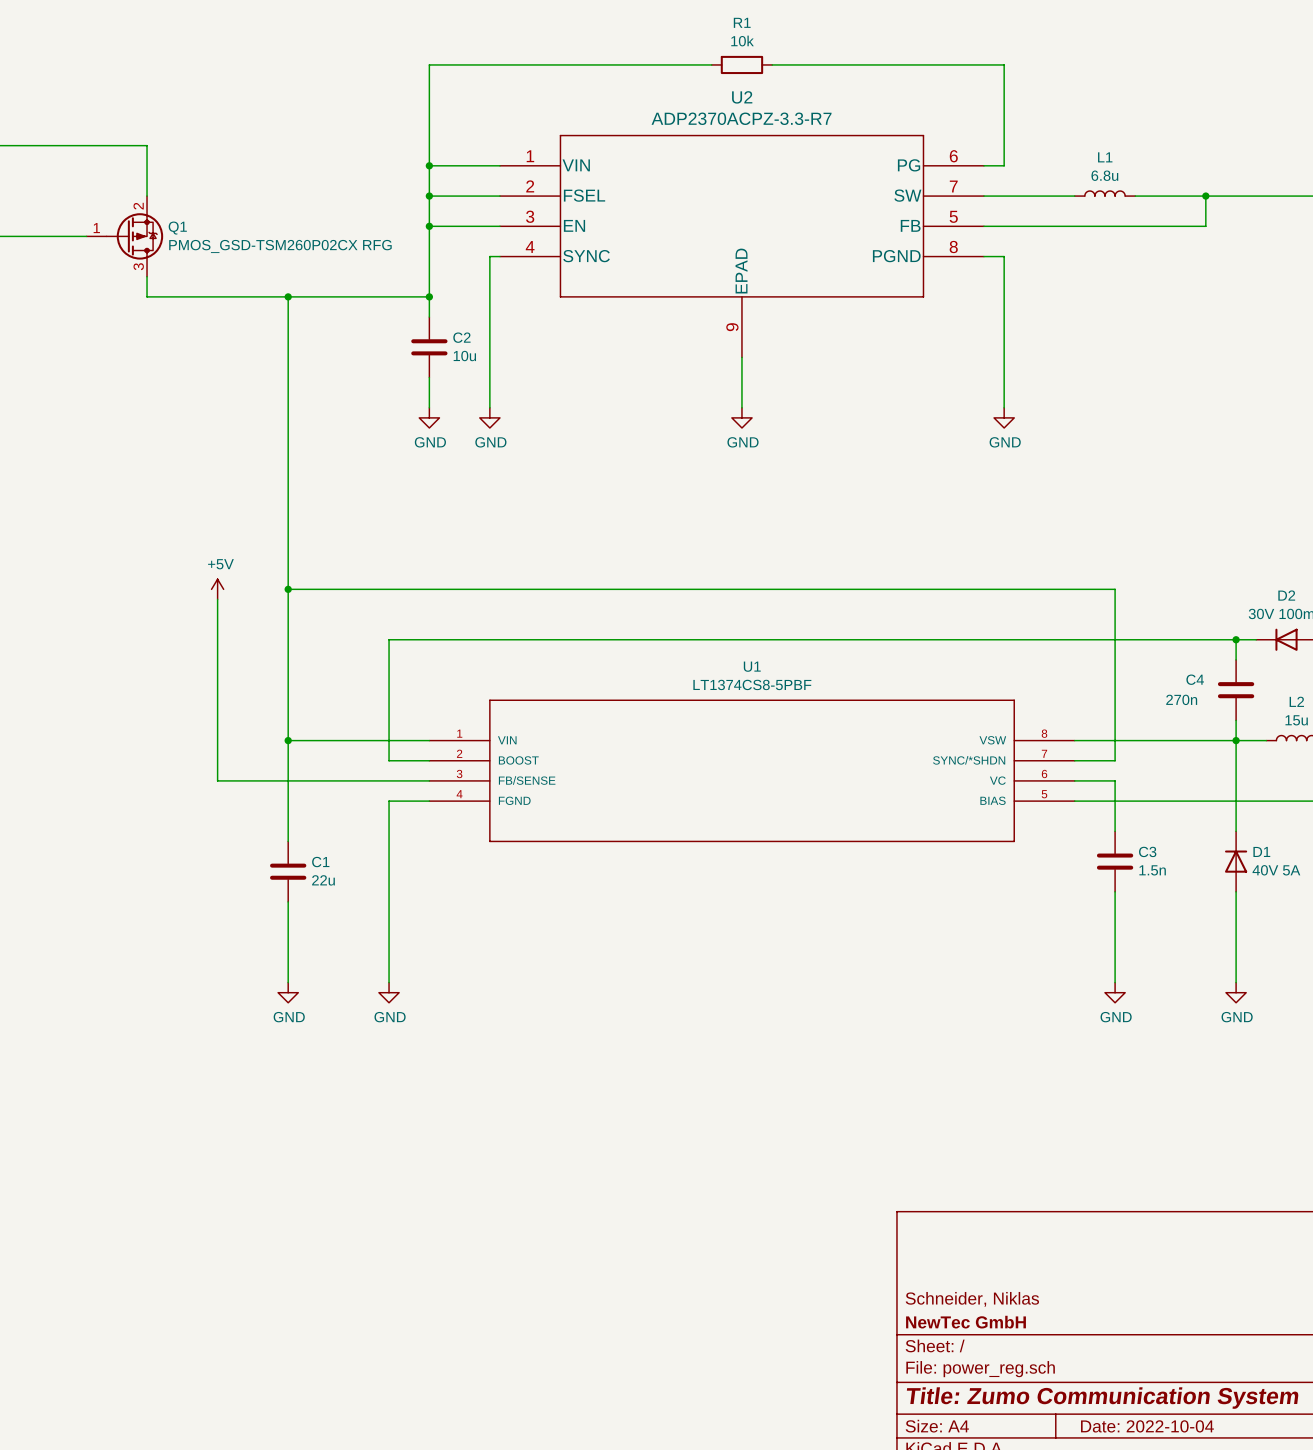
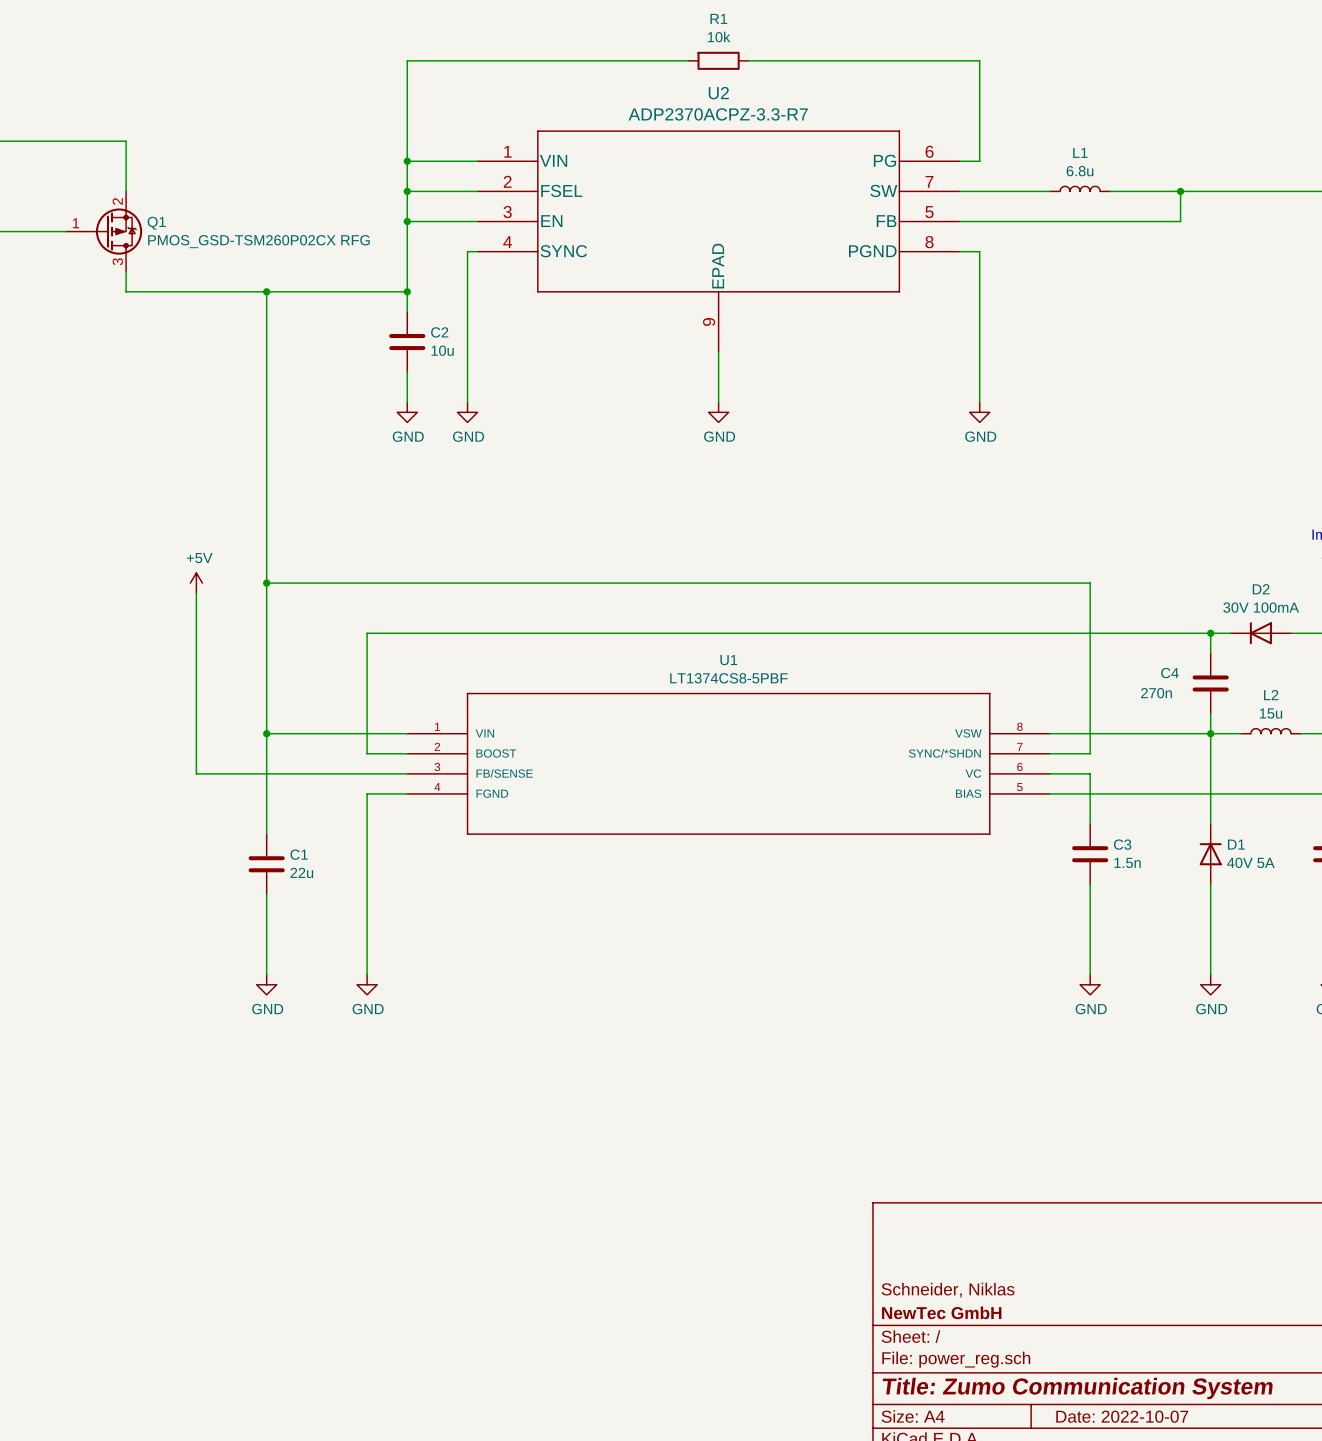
title block: Date: 2022-10-04 (1147, 1426) -> Date: 2022-10-07 (1122, 1416)

